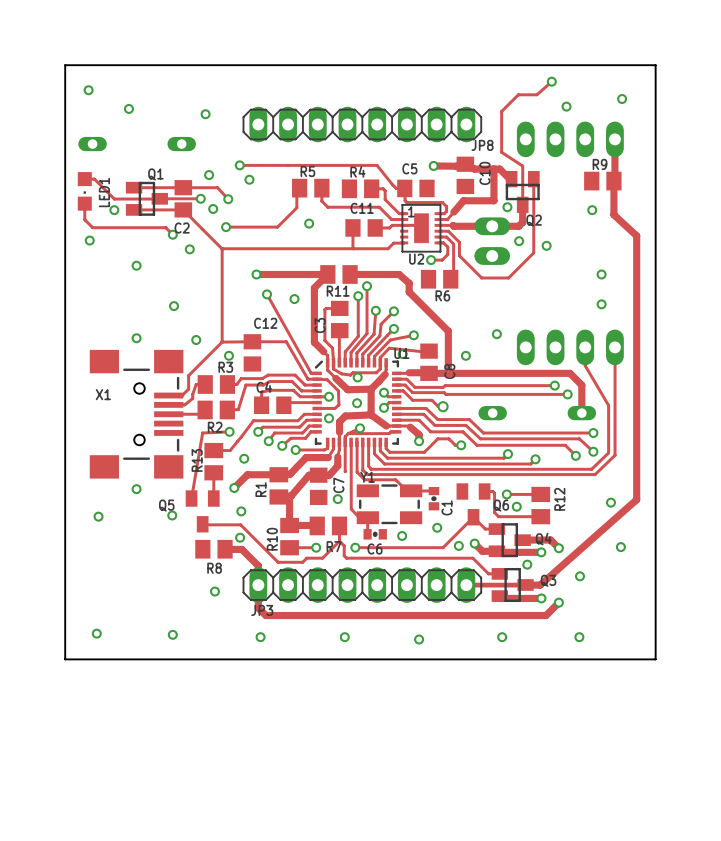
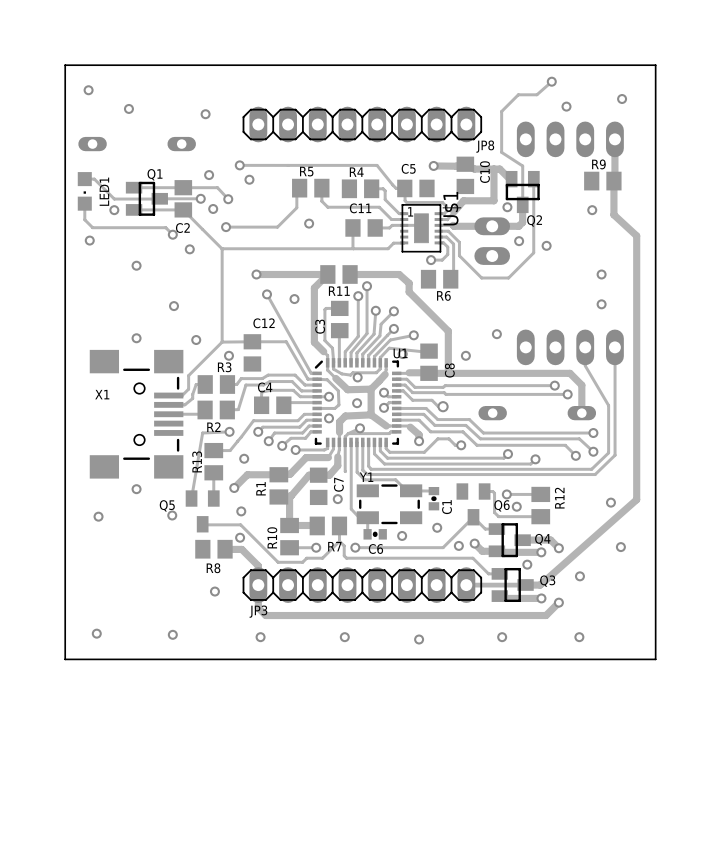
U2 name: U2 (416, 259) -> U$1 (451, 208)

